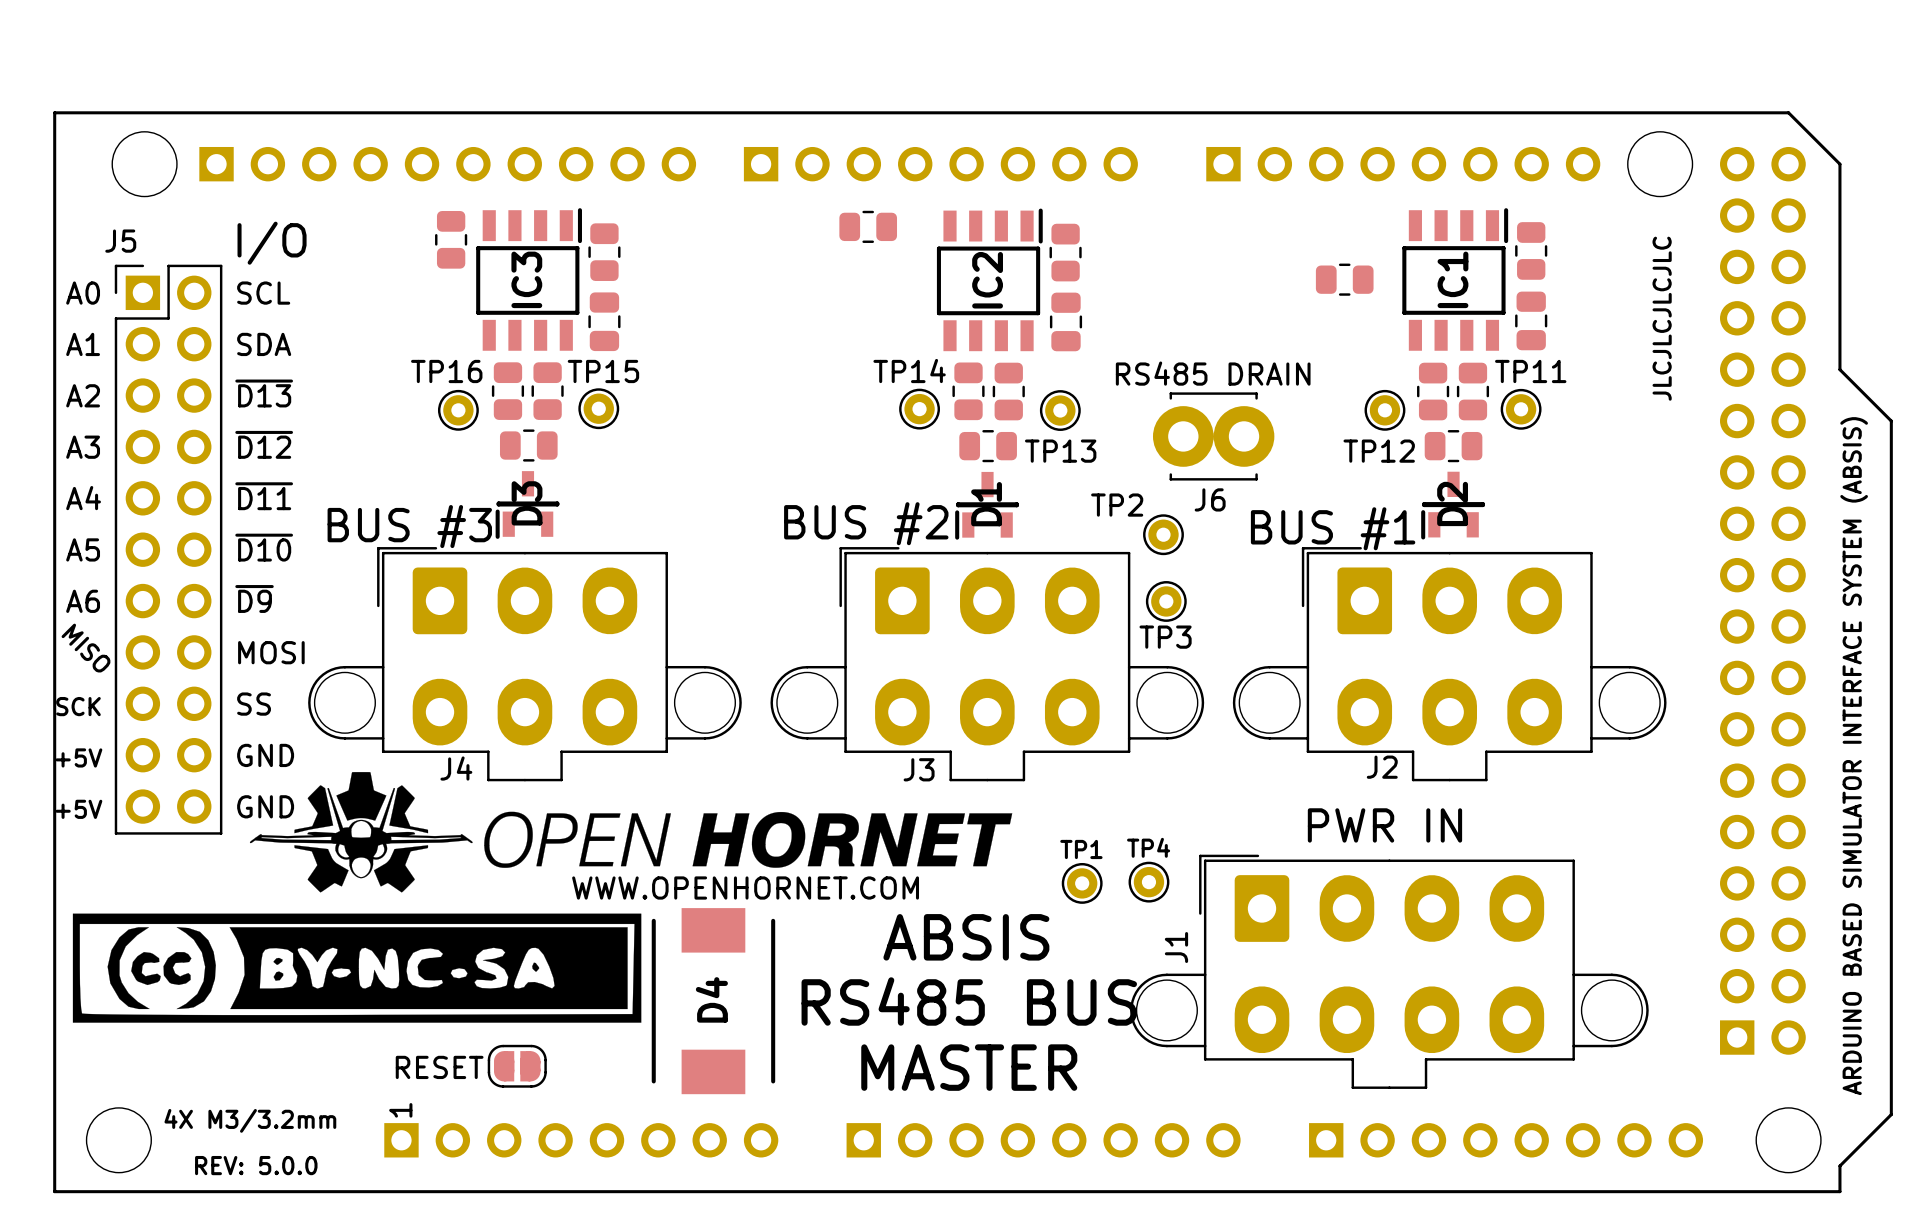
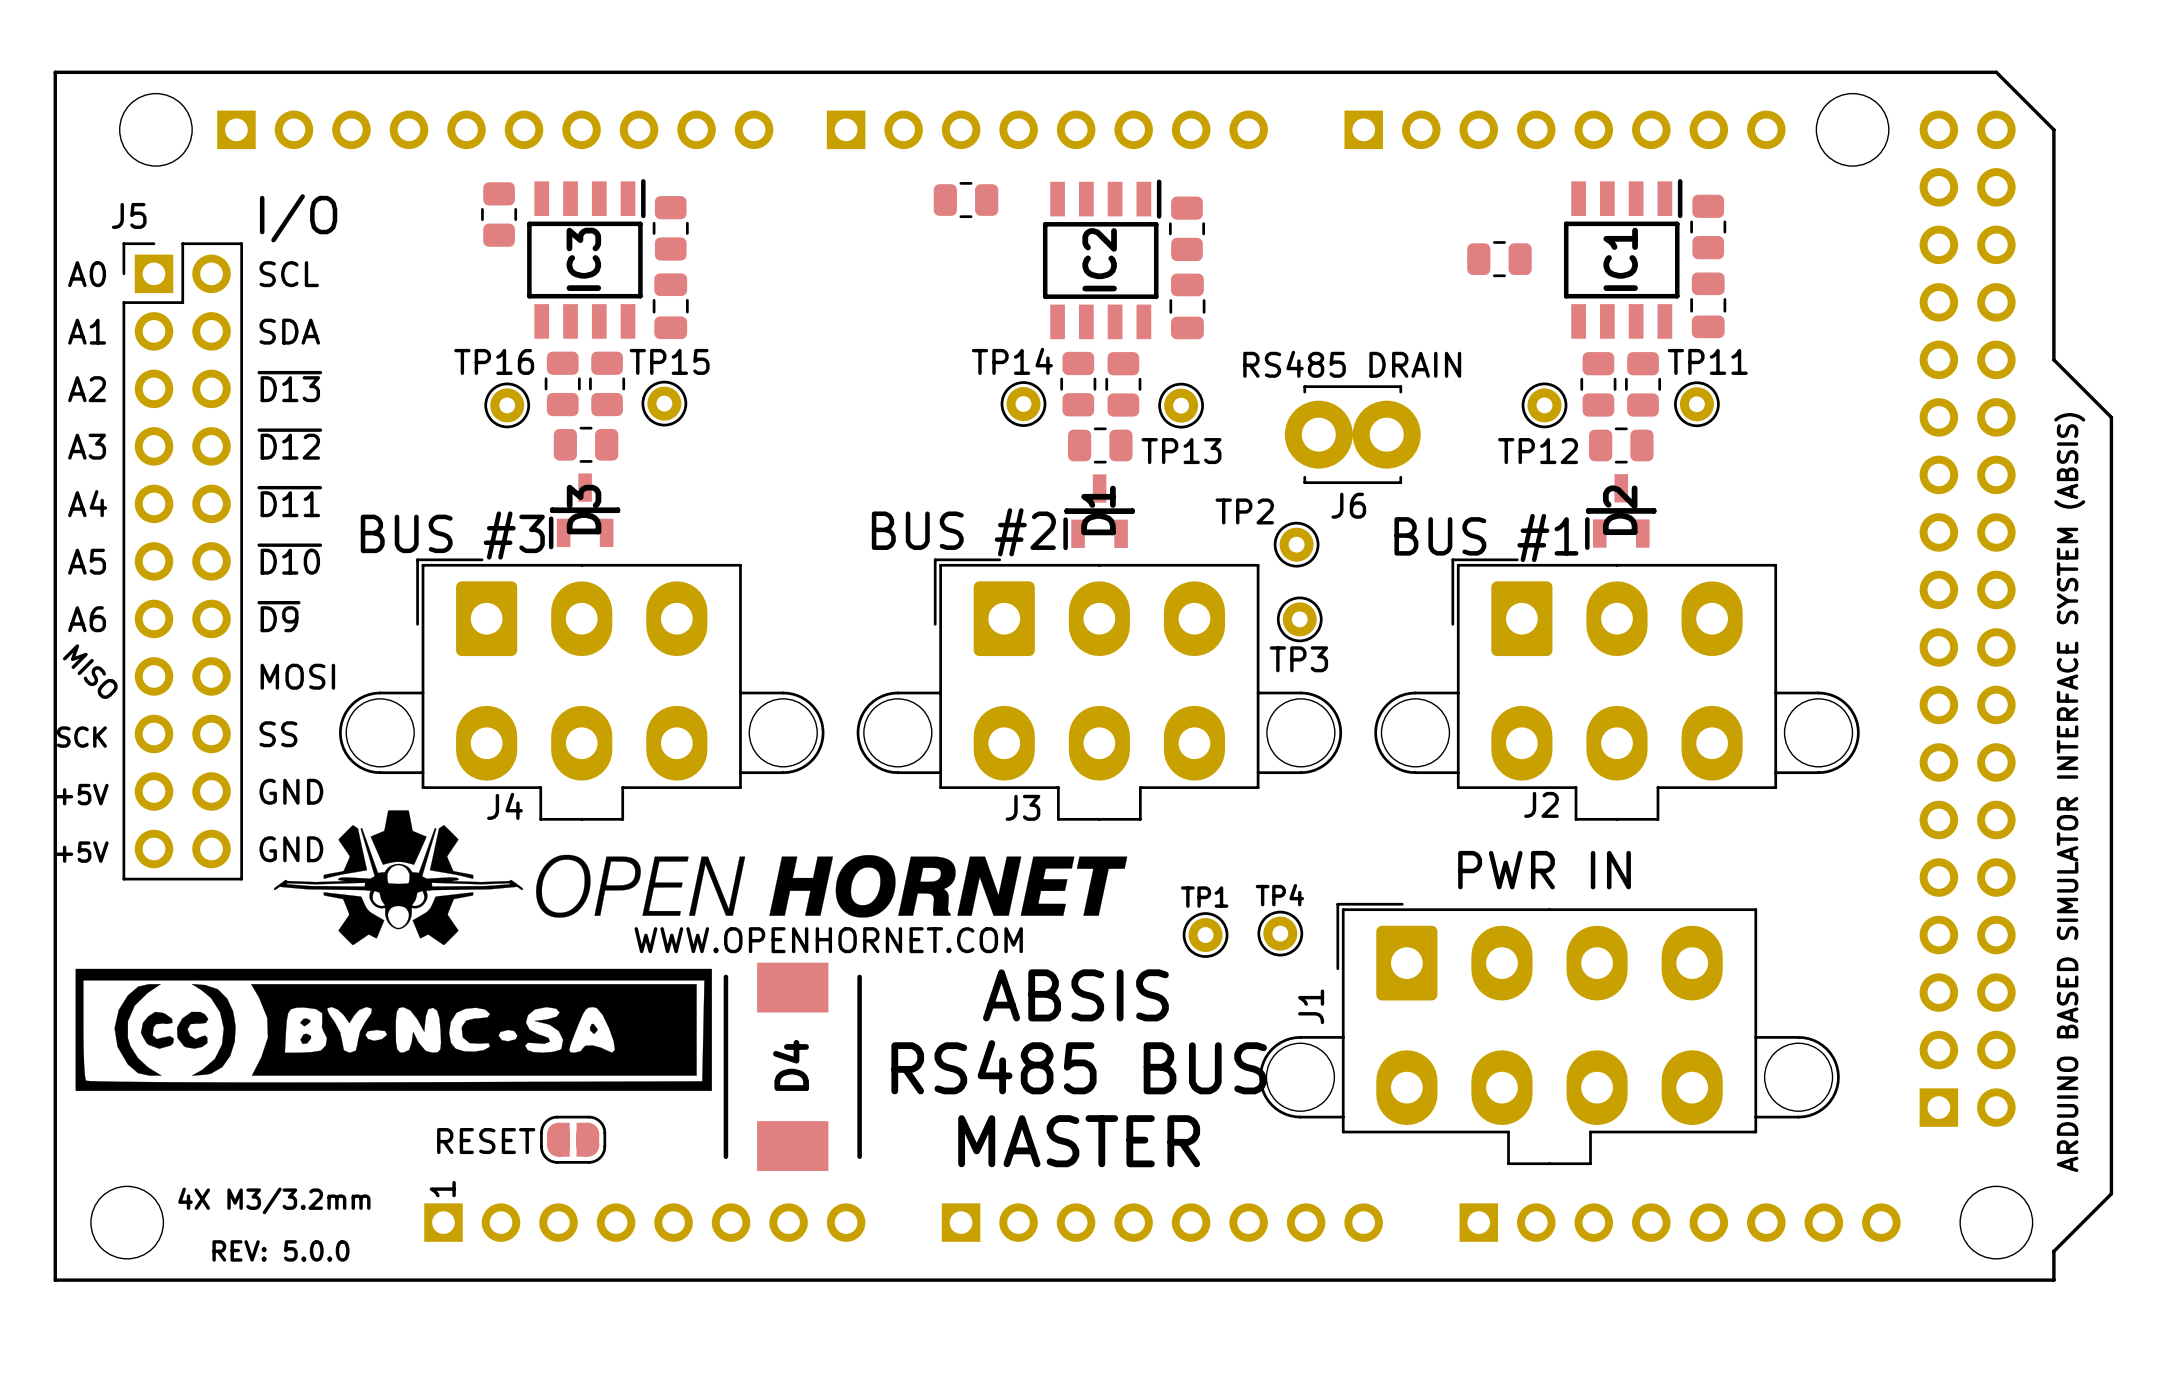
text: JLCJLCJLCJLC (1662, 318) -> none

